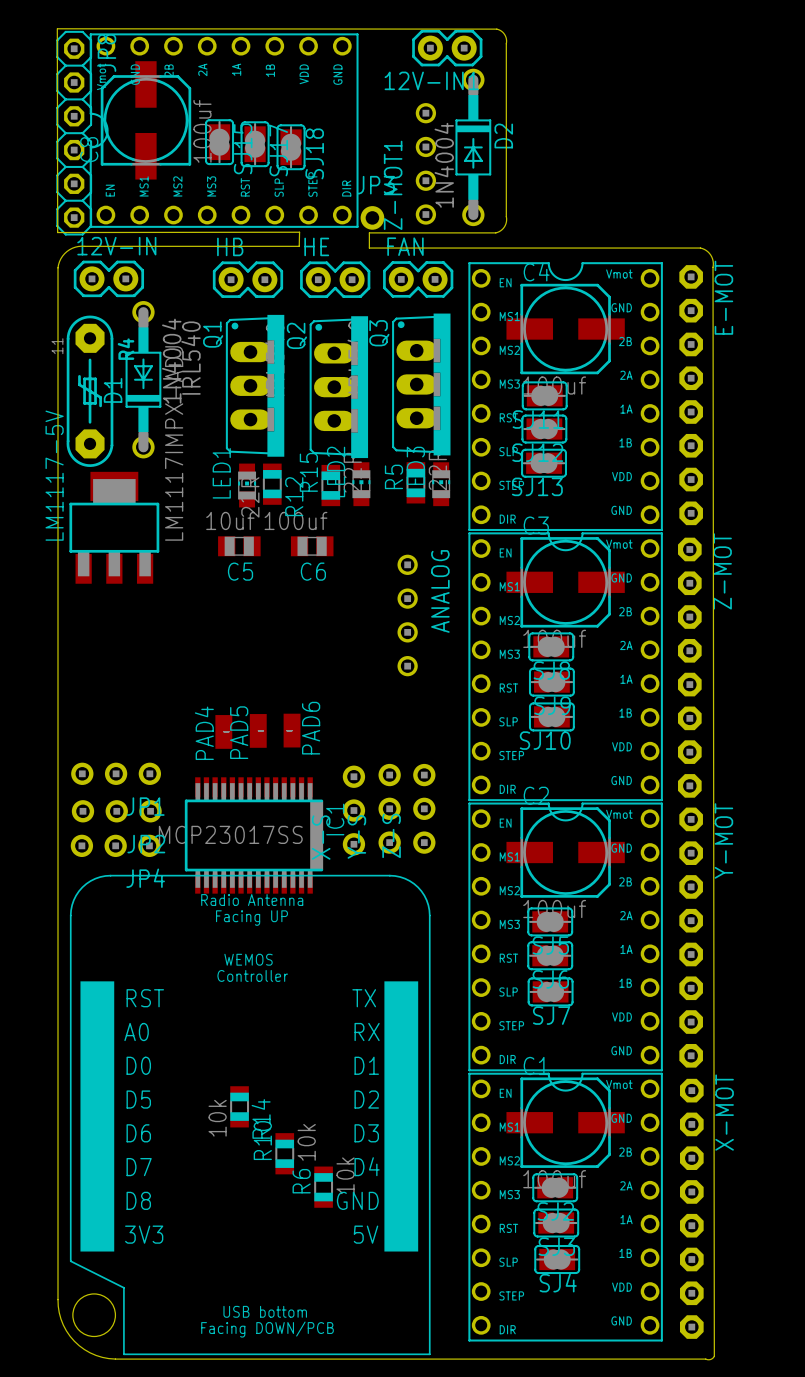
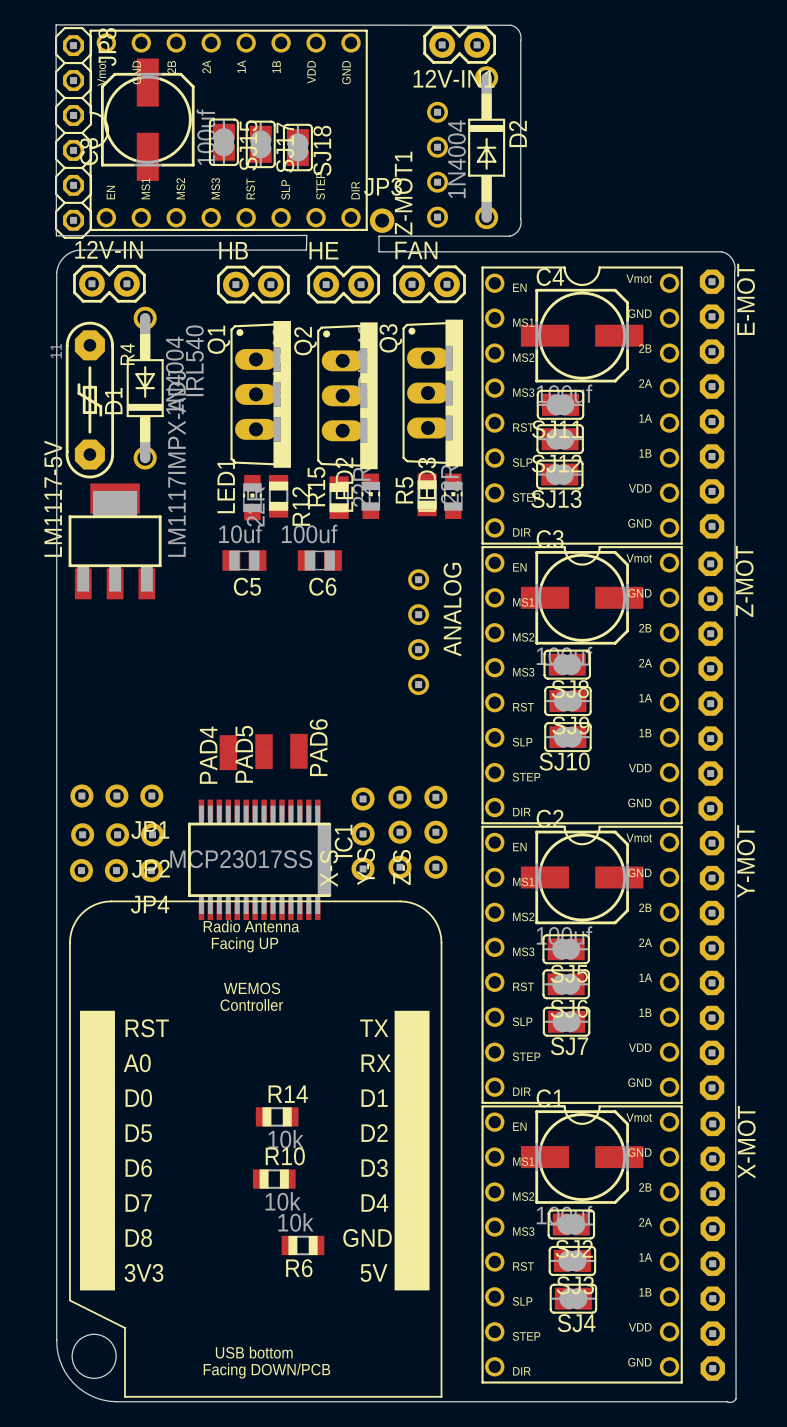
R14 rotation: 0° (239, 1106) -> 90° clockwise (277, 1116)
R14 position: (239, 1106) -> (277, 1116)
R14 value position: 10k (217, 1118) -> 10k (286, 1139)
R14 name position: R14 (261, 1118) -> R14 (288, 1094)
R10 rotation: 0° (284, 1153) -> 90° clockwise (274, 1179)
R6 value position: 10k (345, 1175) -> 10k (295, 1222)
R6 name position: R6 (301, 1181) -> R6 (299, 1268)
R6 rotation: 0° (323, 1187) -> 90° clockwise (302, 1245)
R6 position: (323, 1187) -> (302, 1245)

